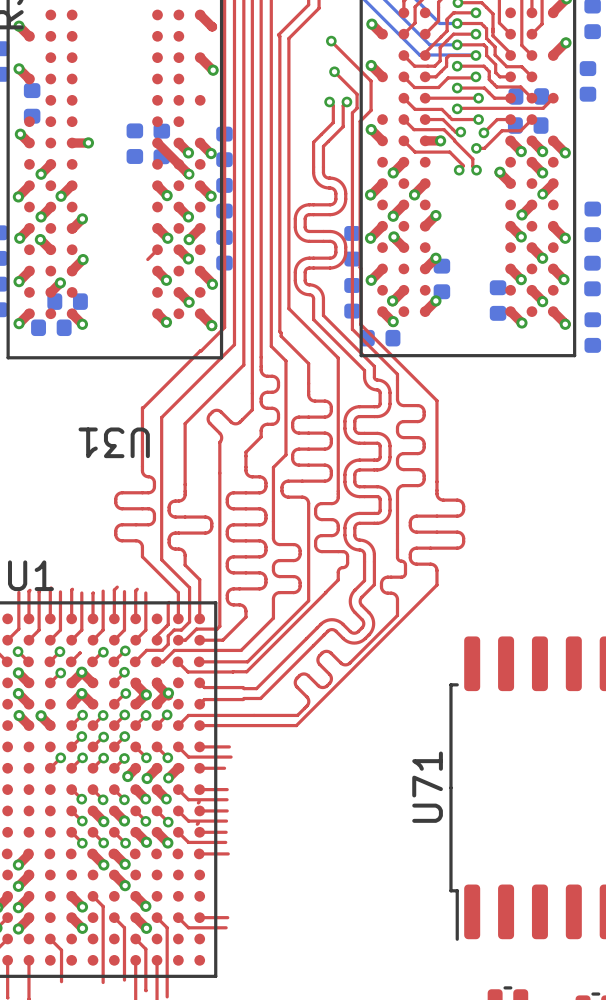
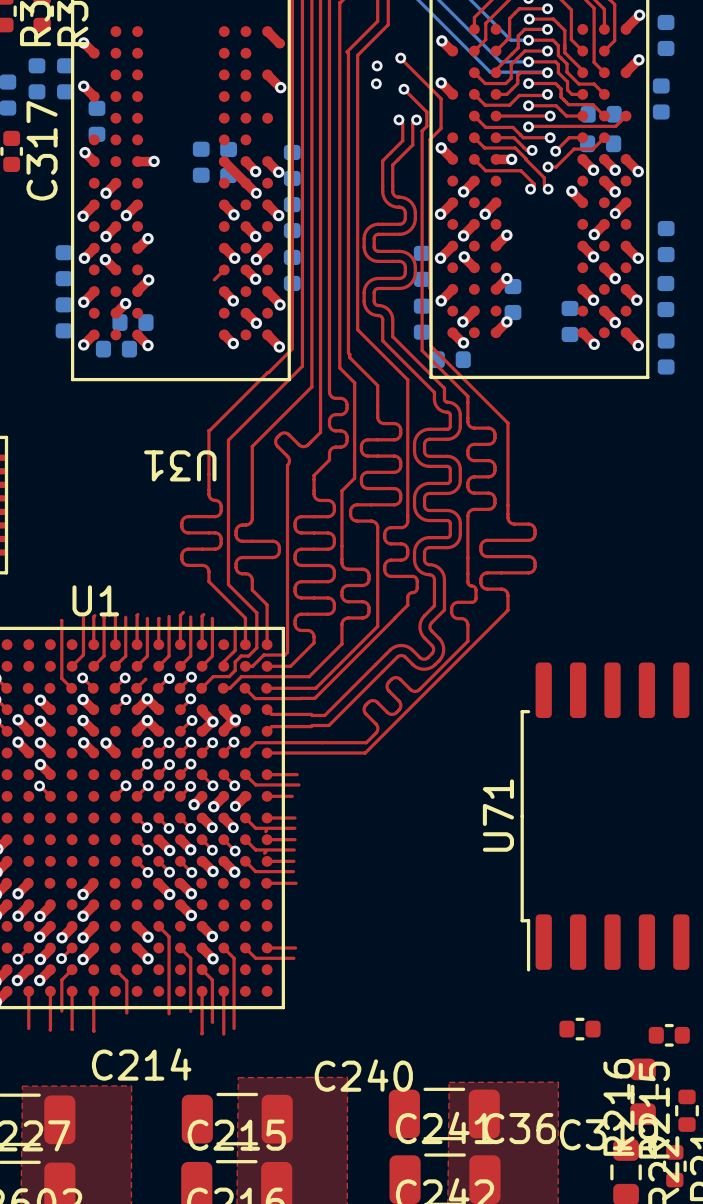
via: none -> (377, 65)
via: none -> (376, 83)

